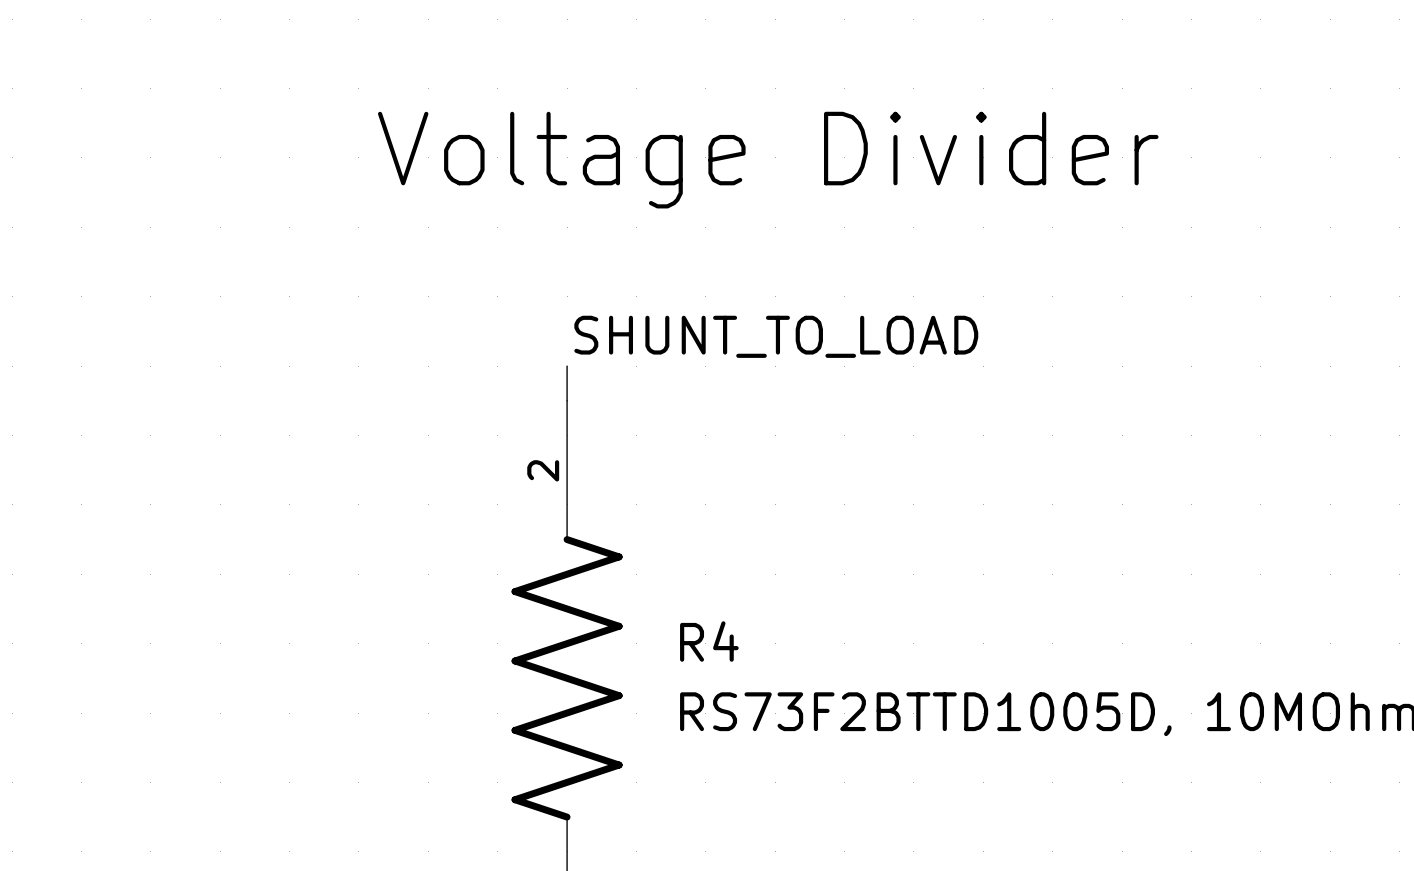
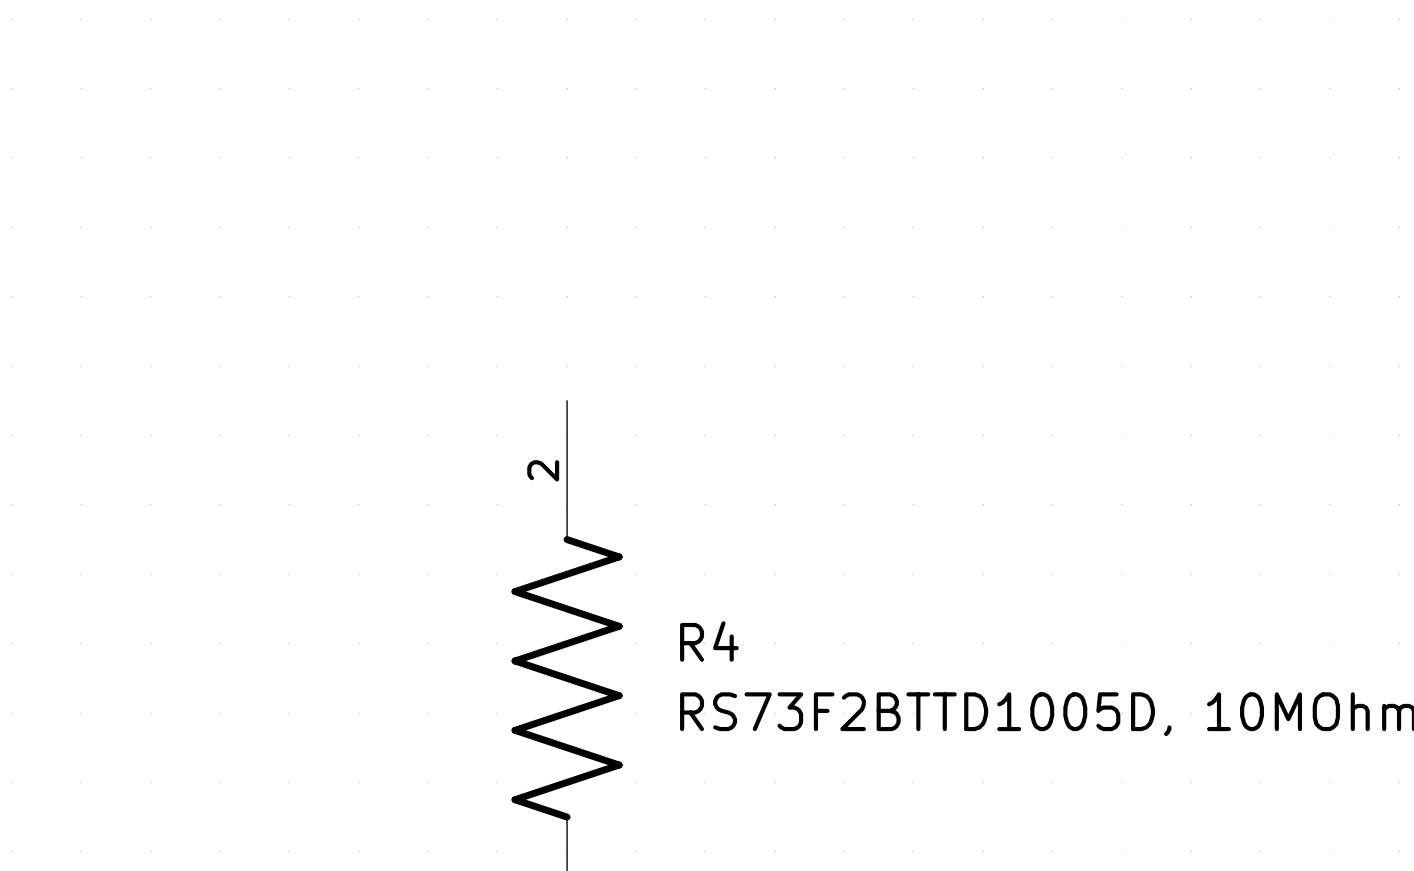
text: Voltage Divider (768, 160) -> none
label: SHUNT_TO_LOAD (776, 336) -> none
wire: (567, 366) (567, 400) -> none

